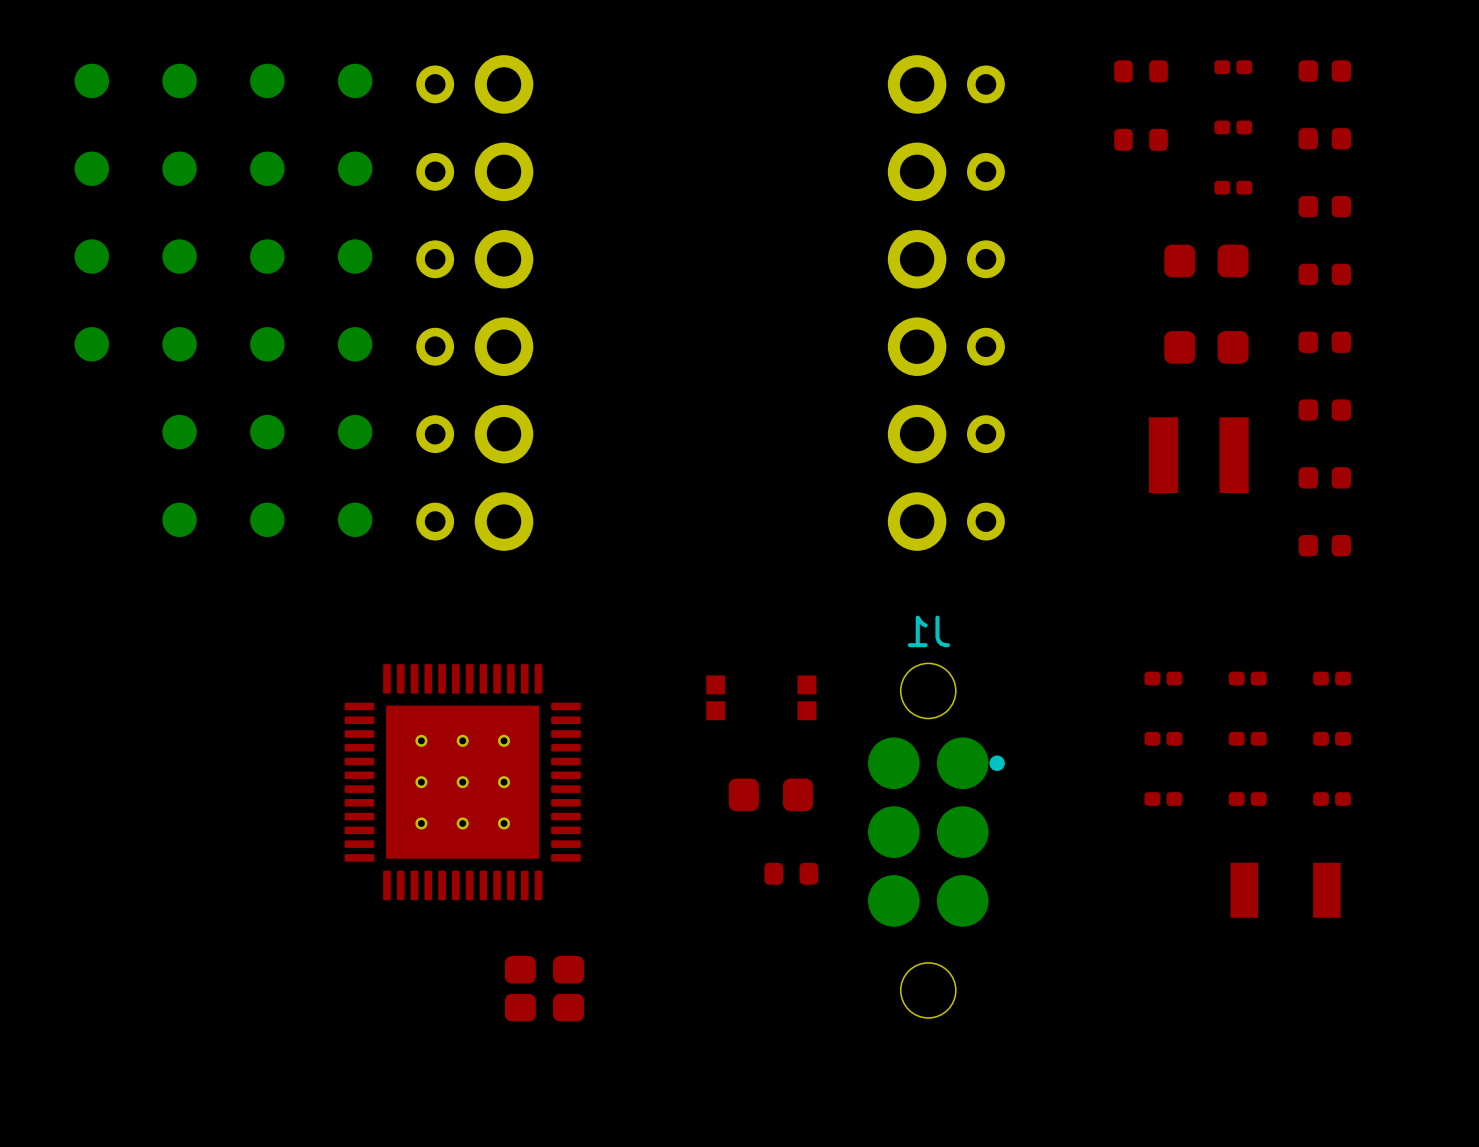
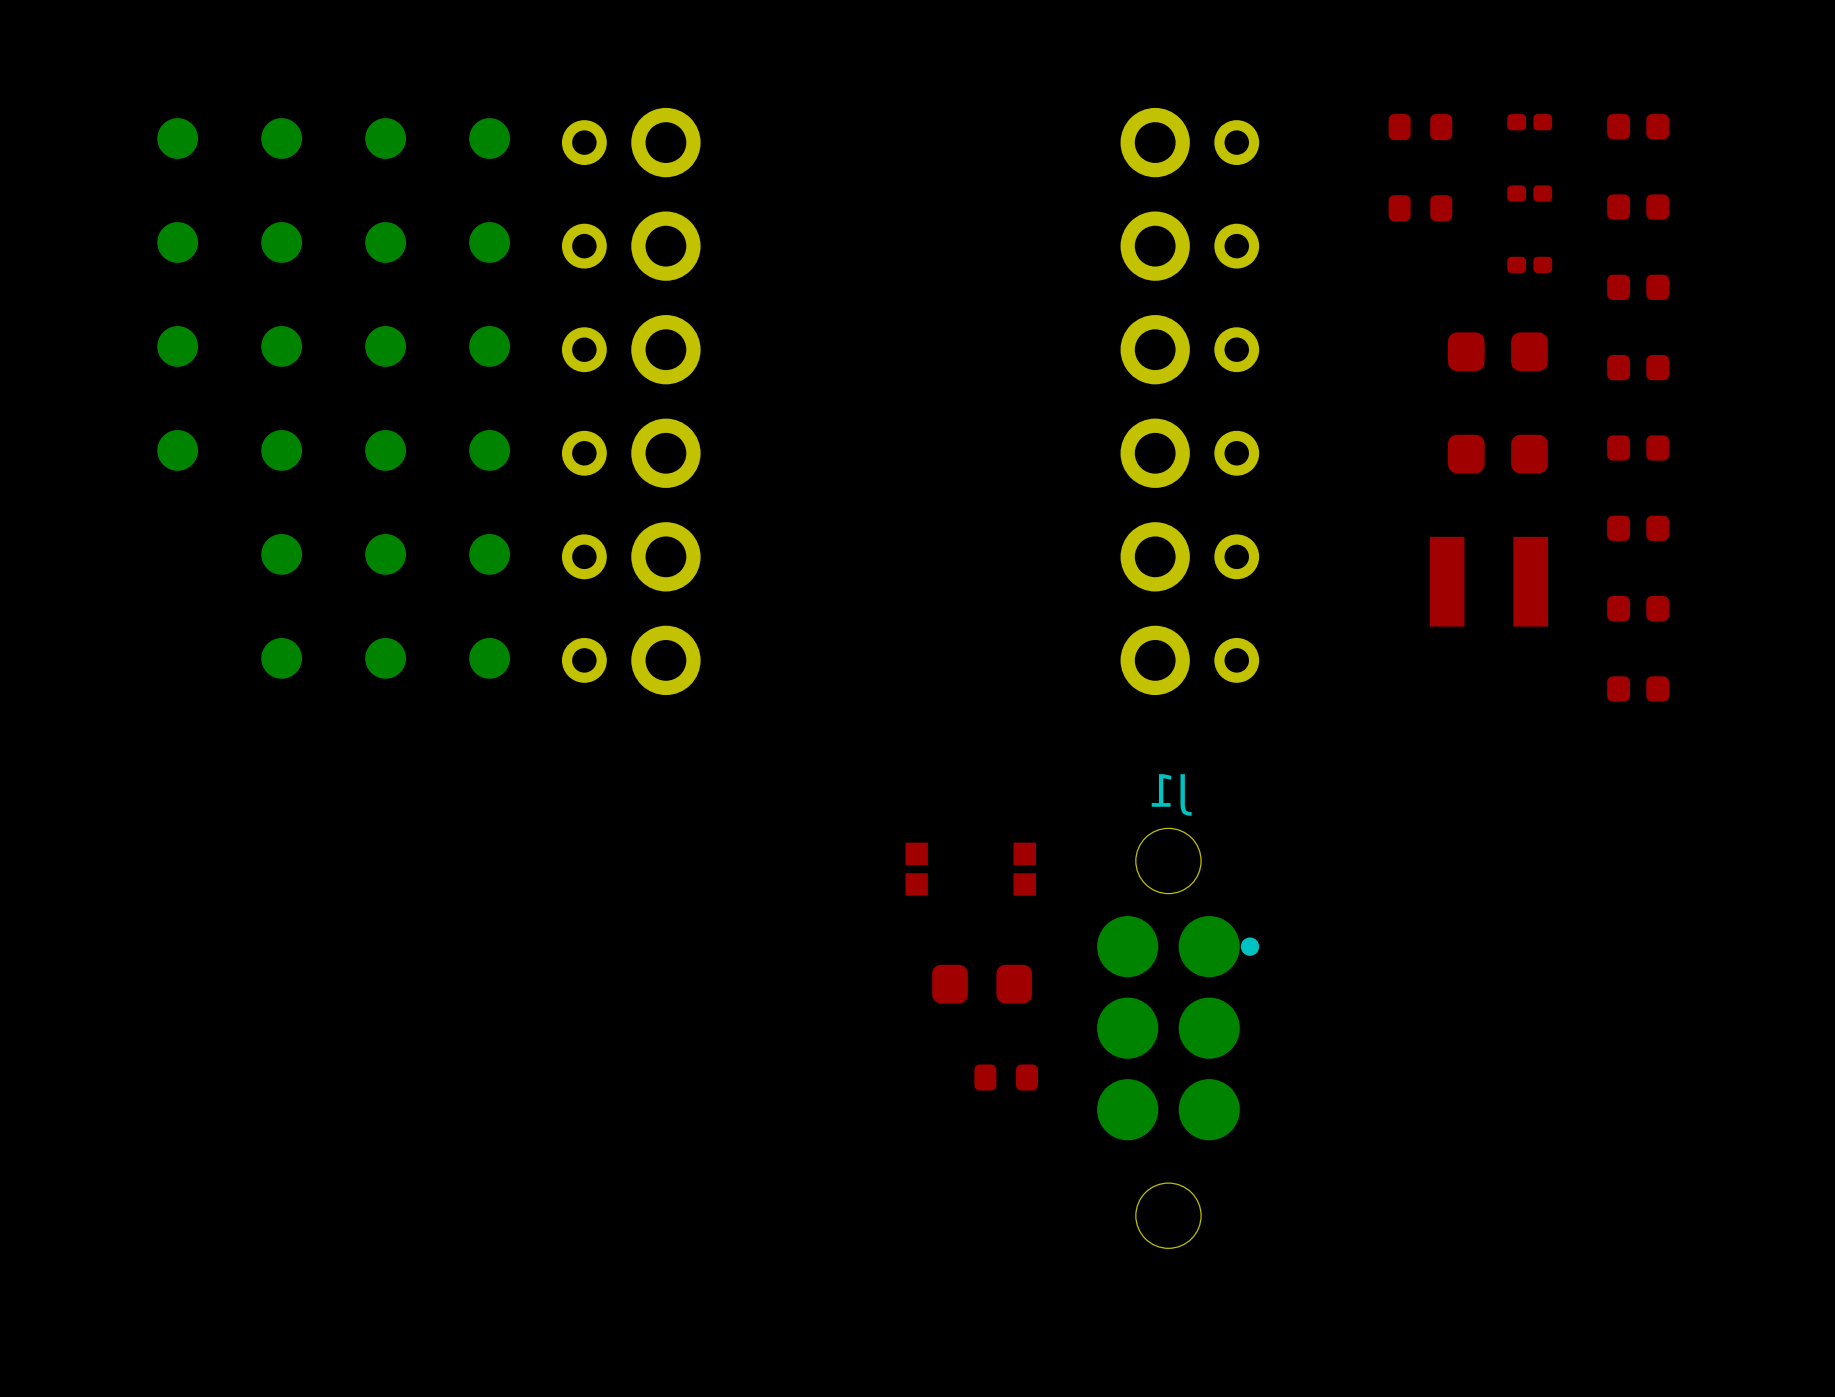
part: (1163, 678) -> none
part: (1247, 678) -> none
part: (1332, 678) -> none
part: (1163, 738) -> none
part: (1247, 738) -> none
part: (1332, 738) -> none
part: (462, 782) -> none
part: (1163, 799) -> none
part: (1247, 799) -> none
part: (1332, 799) -> none
part: (1285, 890) -> none
part: (544, 988) -> none

